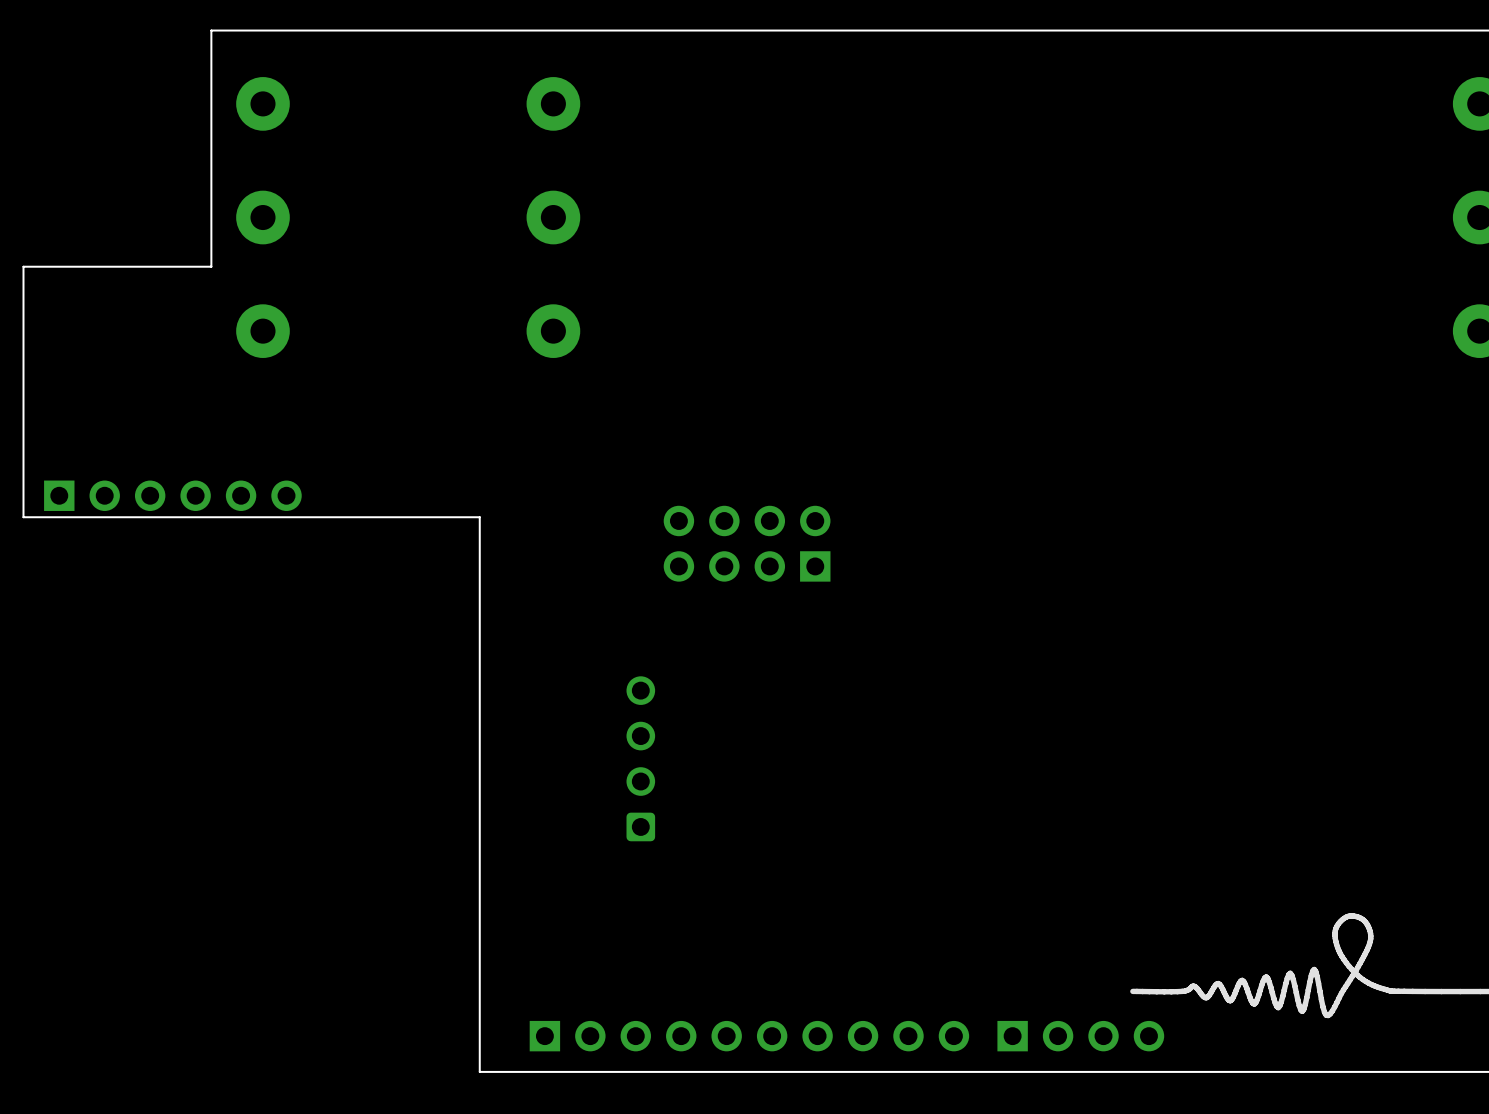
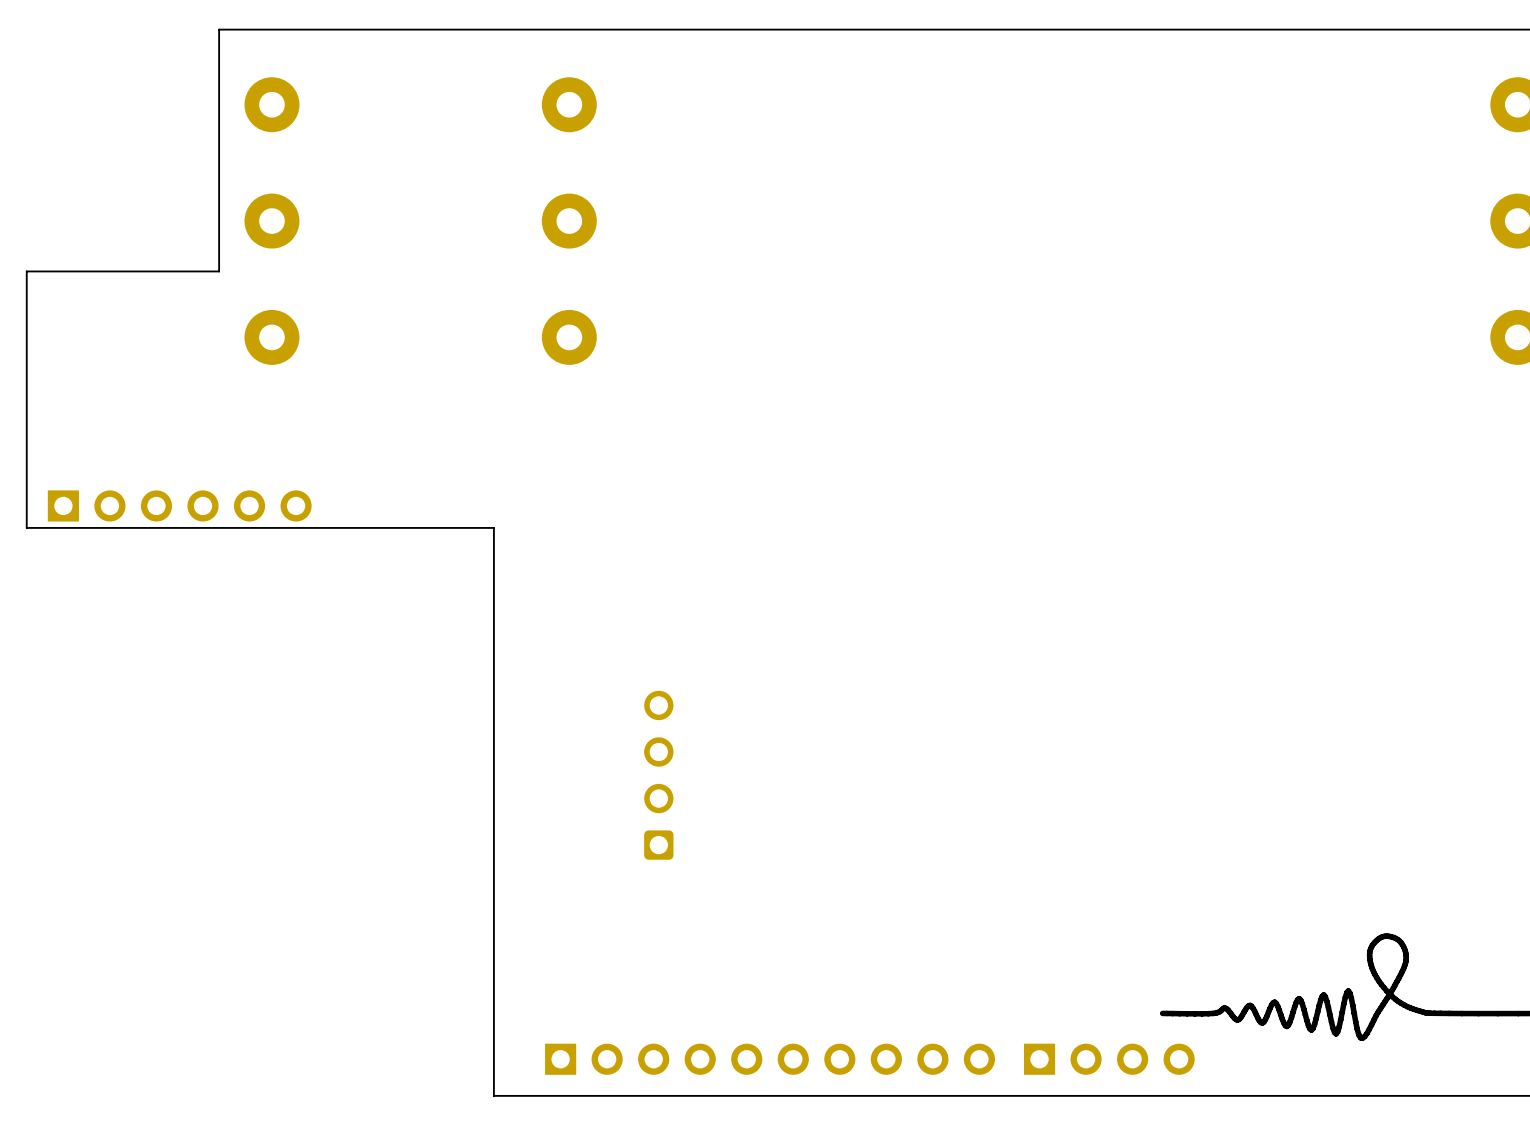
part: (747, 543) -> none

